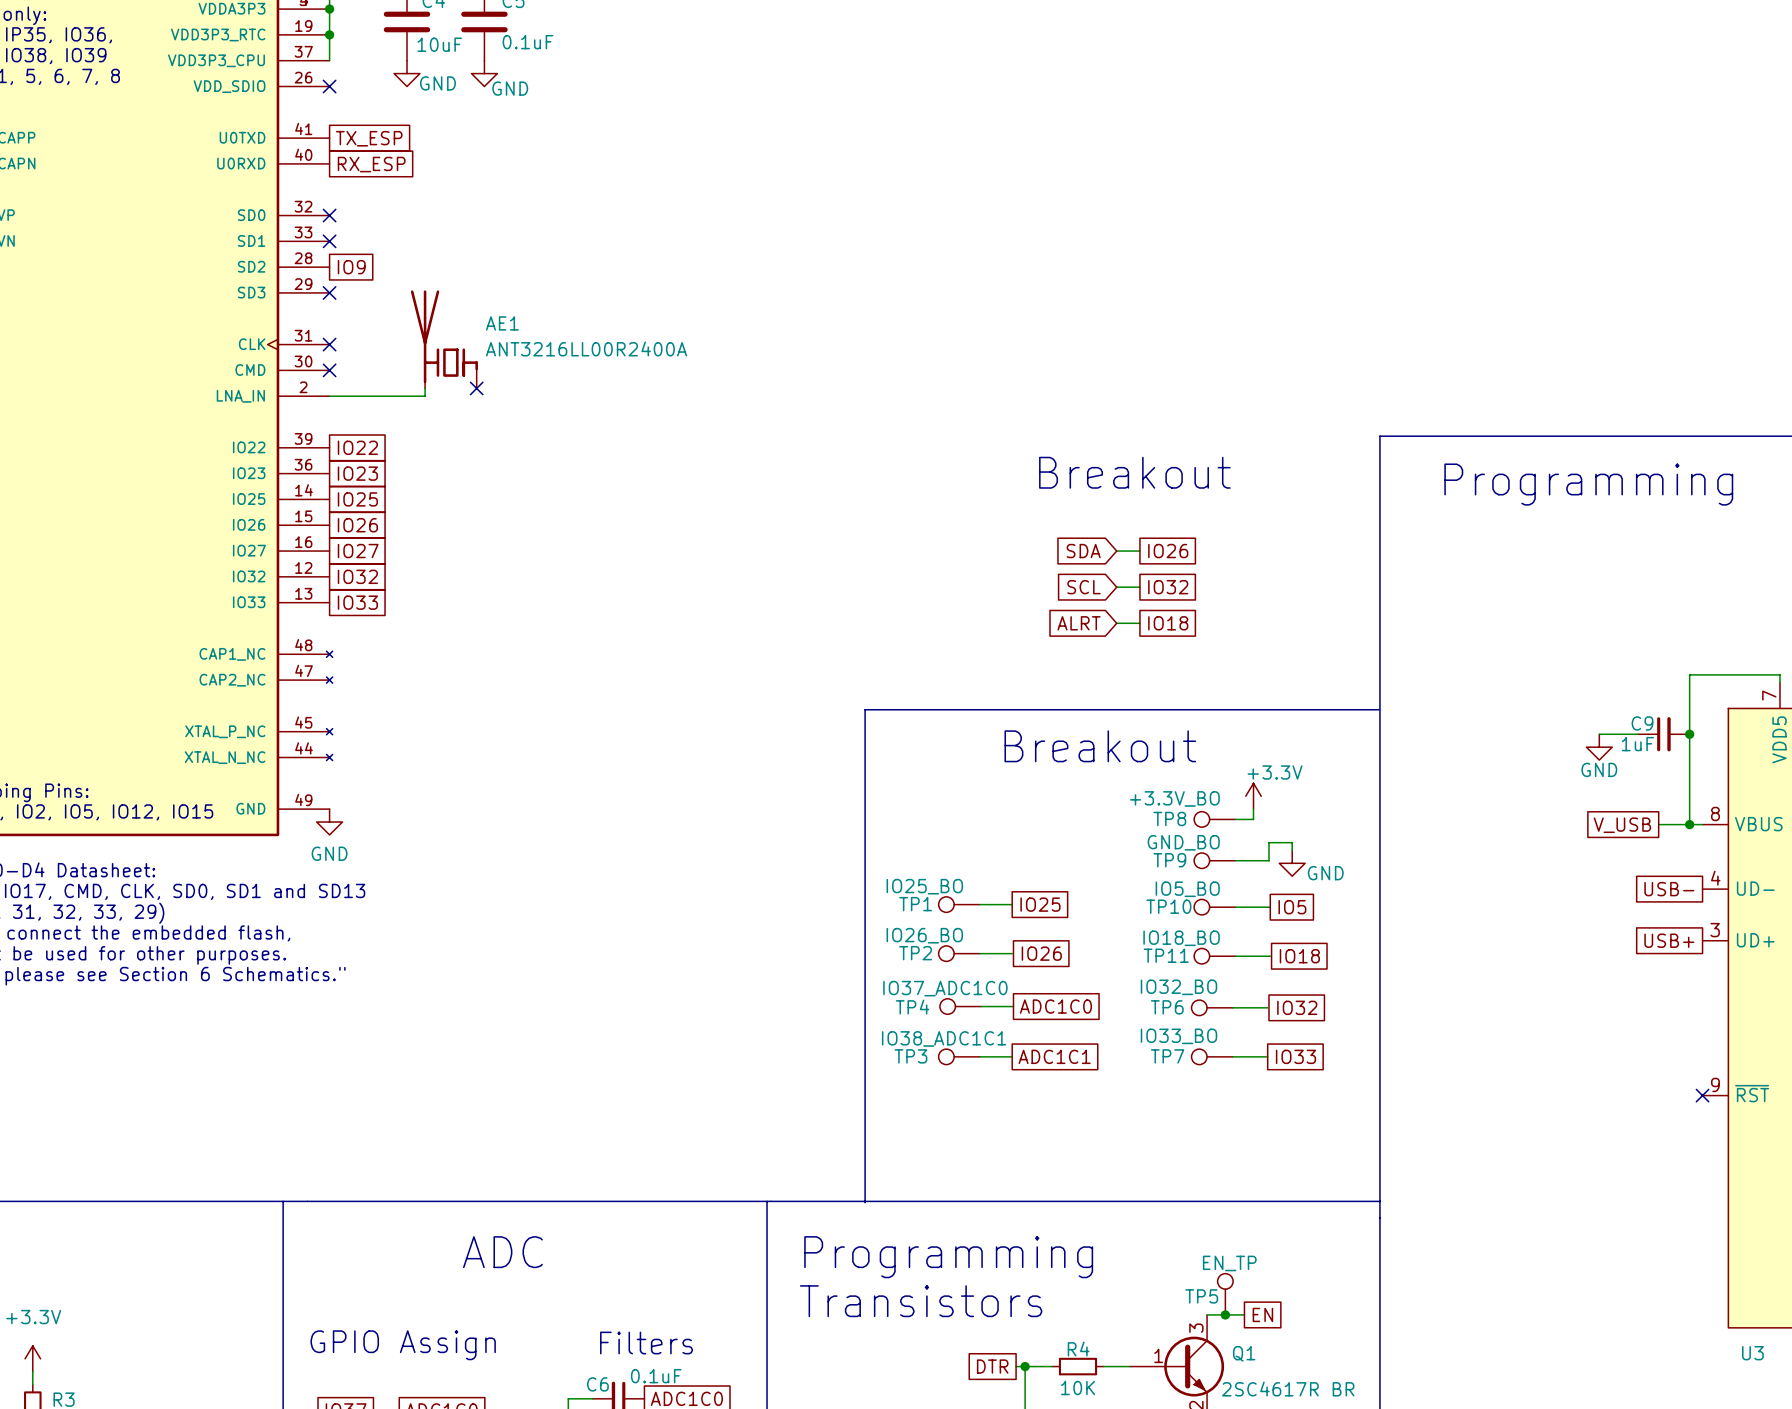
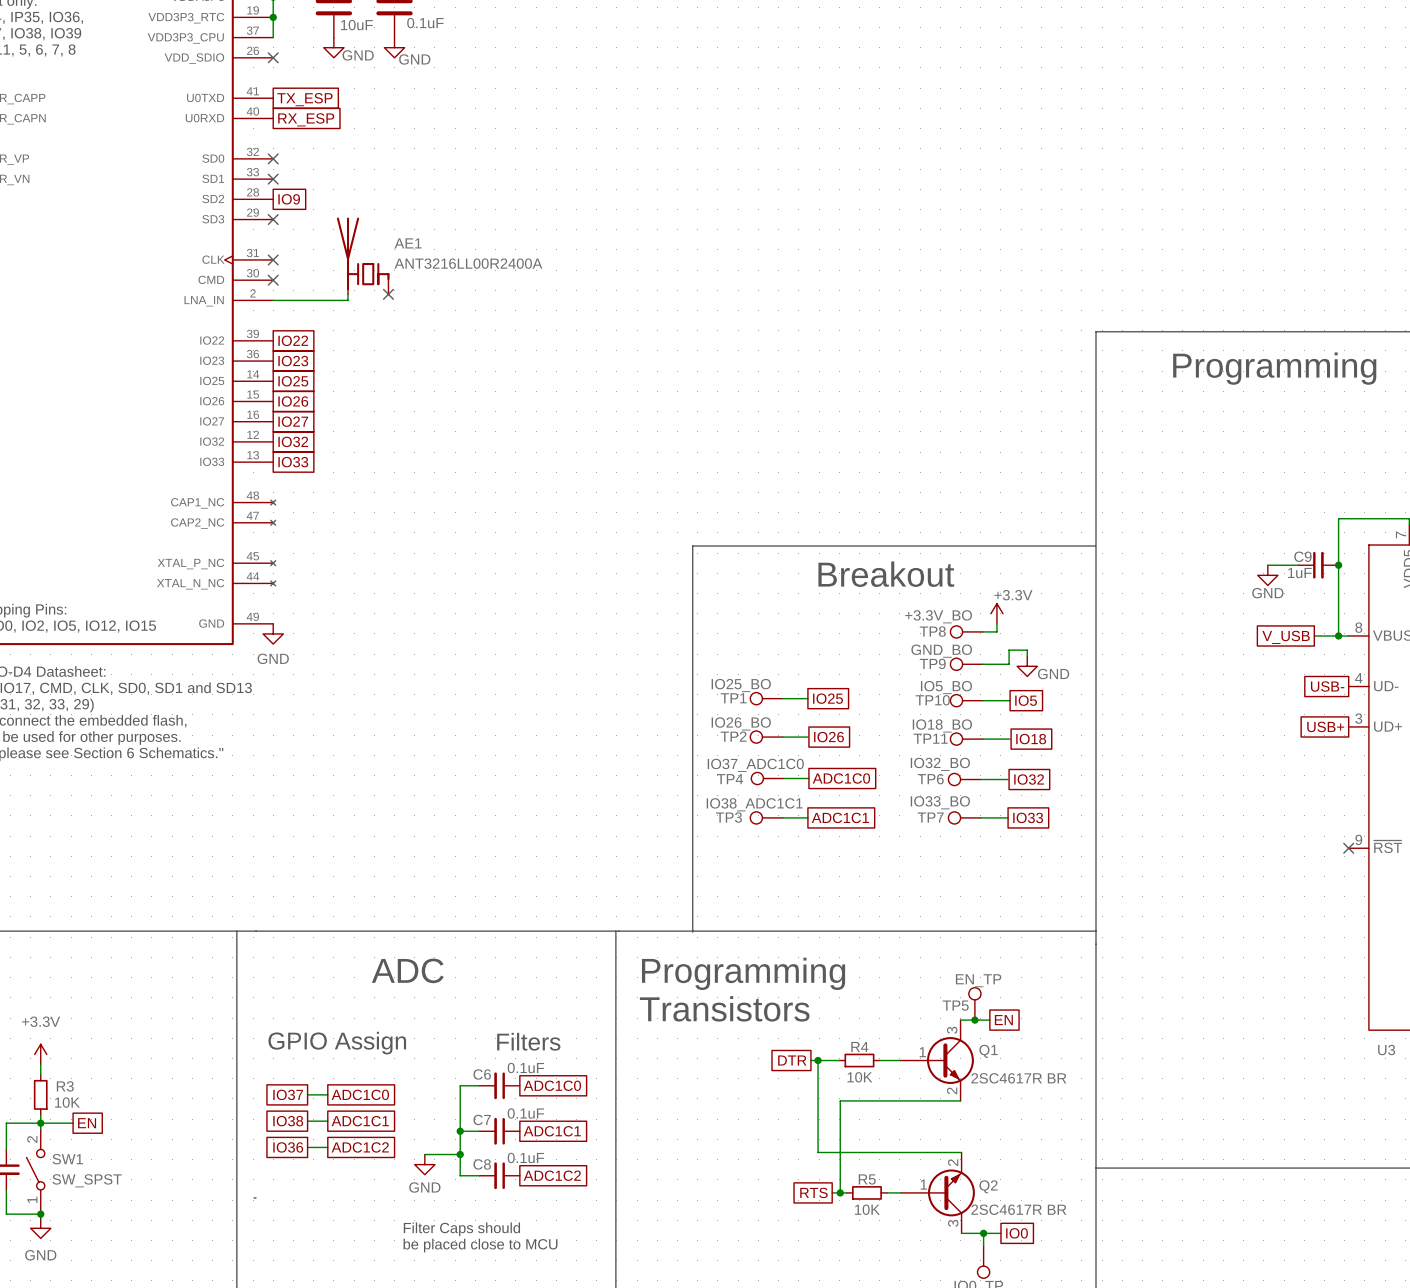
text: Breakout (1134, 472) -> none
global label: SDA (1083, 551) -> none
wire: (1116, 551) (1139, 551) -> none
global label: IO26 (1168, 551) -> none
global label: SCL (1083, 587) -> none
wire: (1116, 587) (1139, 587) -> none
global label: IO32 (1168, 587) -> none
global label: ALRT (1079, 623) -> none
wire: (1116, 623) (1139, 623) -> none
global label: IO18 (1168, 623) -> none

